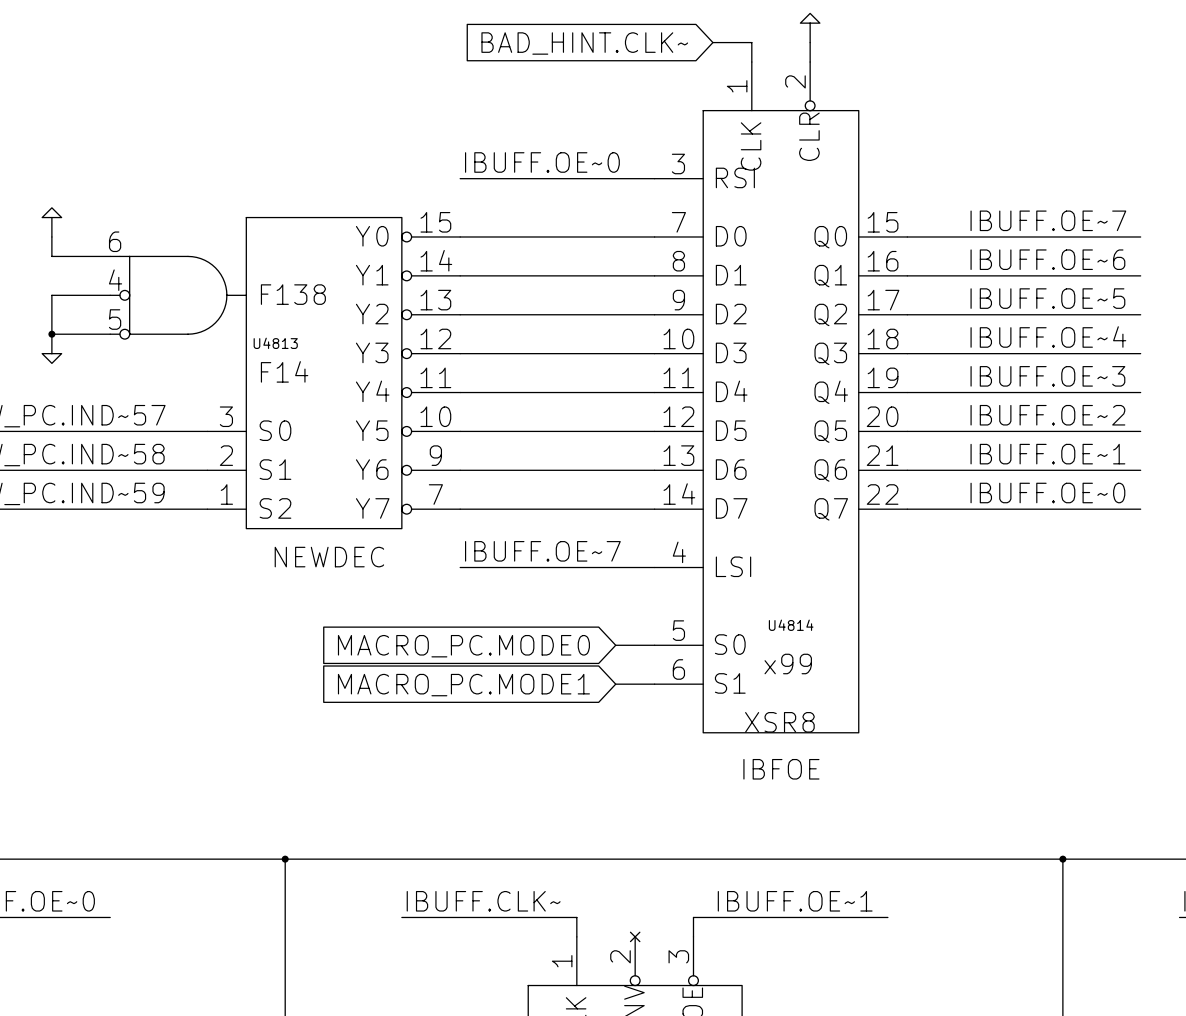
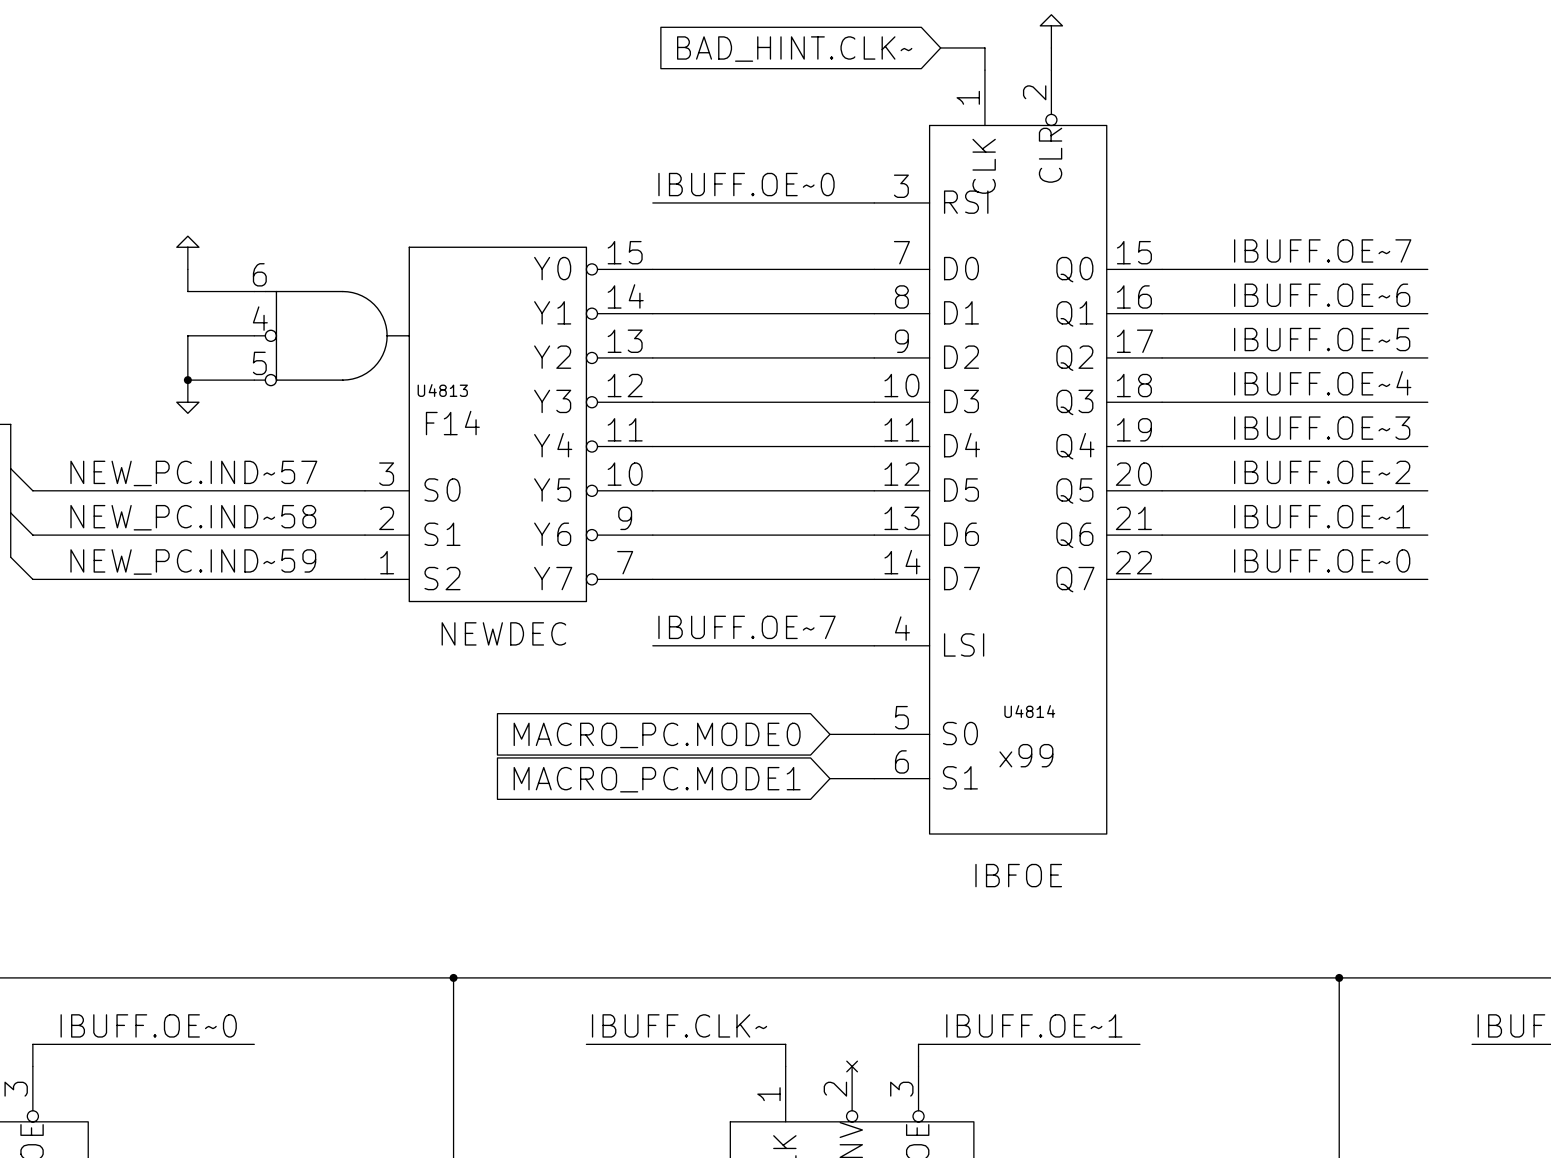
U4813 value: F138 (293, 294) -> none
U4814 value: XSR8 (779, 722) -> none

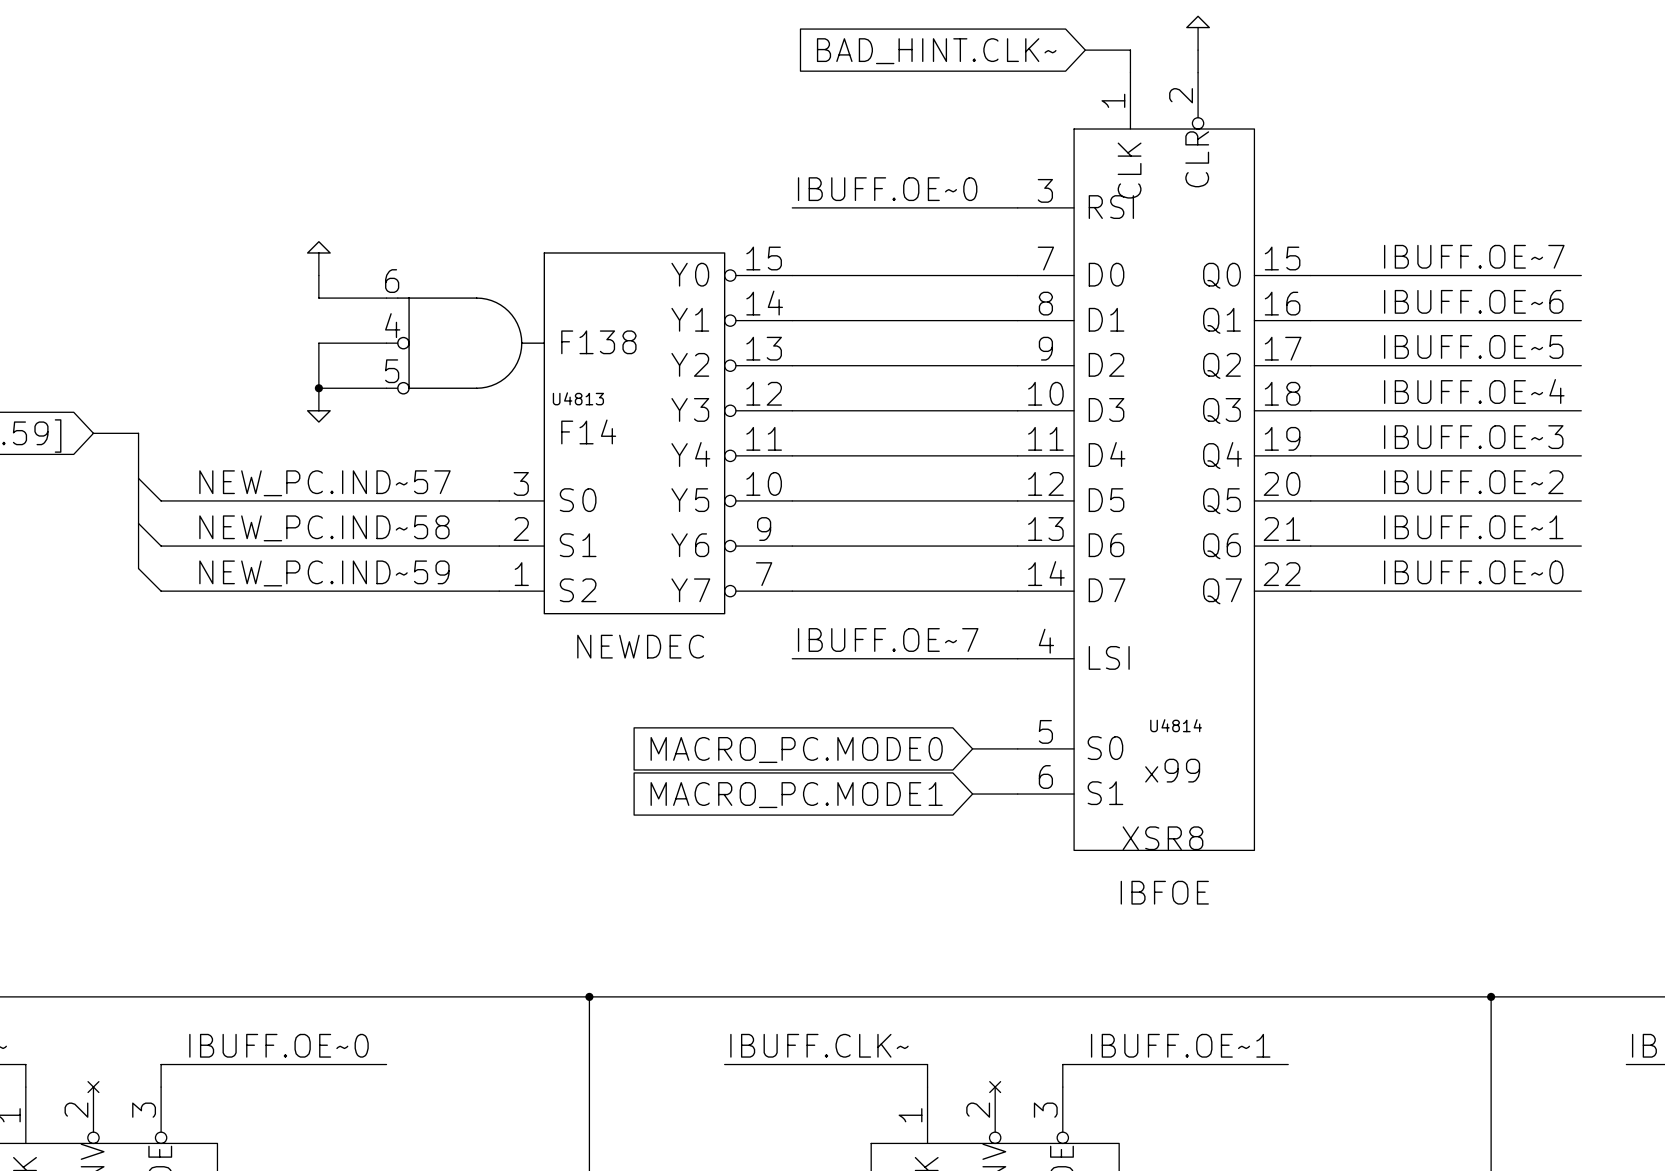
U4813 value: none -> F138 (598, 342)
U4814 value: none -> XSR8 (1162, 838)

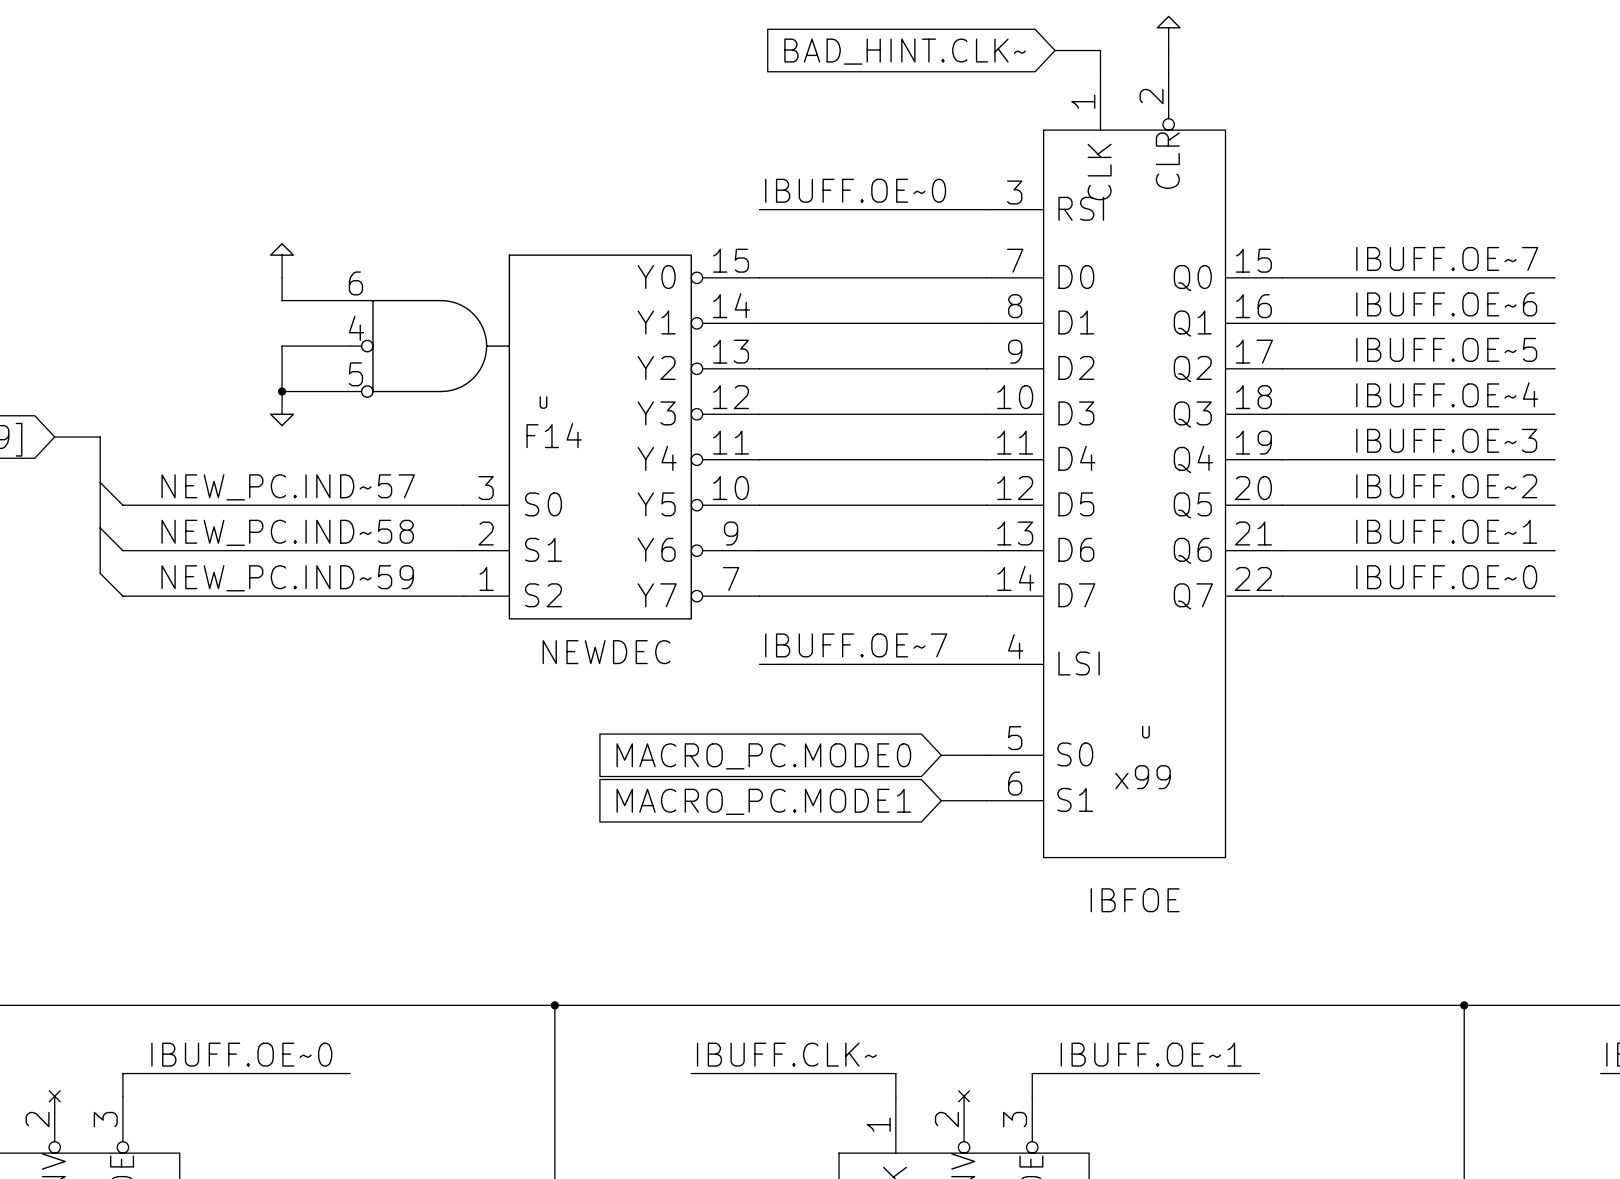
U4813 value: F138 (598, 342) -> none
U4813 name: U4813 (578, 398) -> U (543, 402)
U4814 name: U4814 (1176, 725) -> U (1145, 732)
U4814 value: XSR8 (1162, 838) -> none

